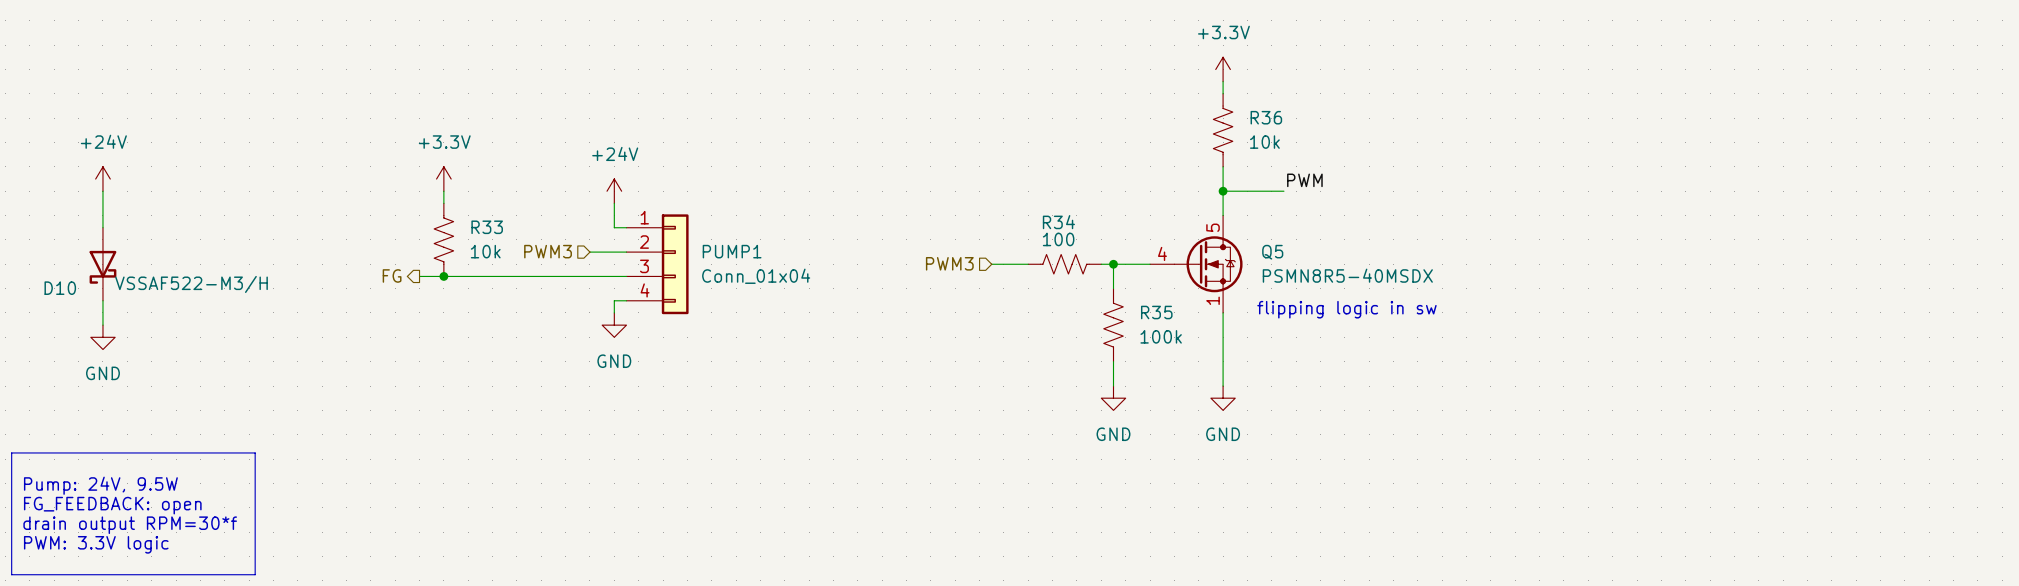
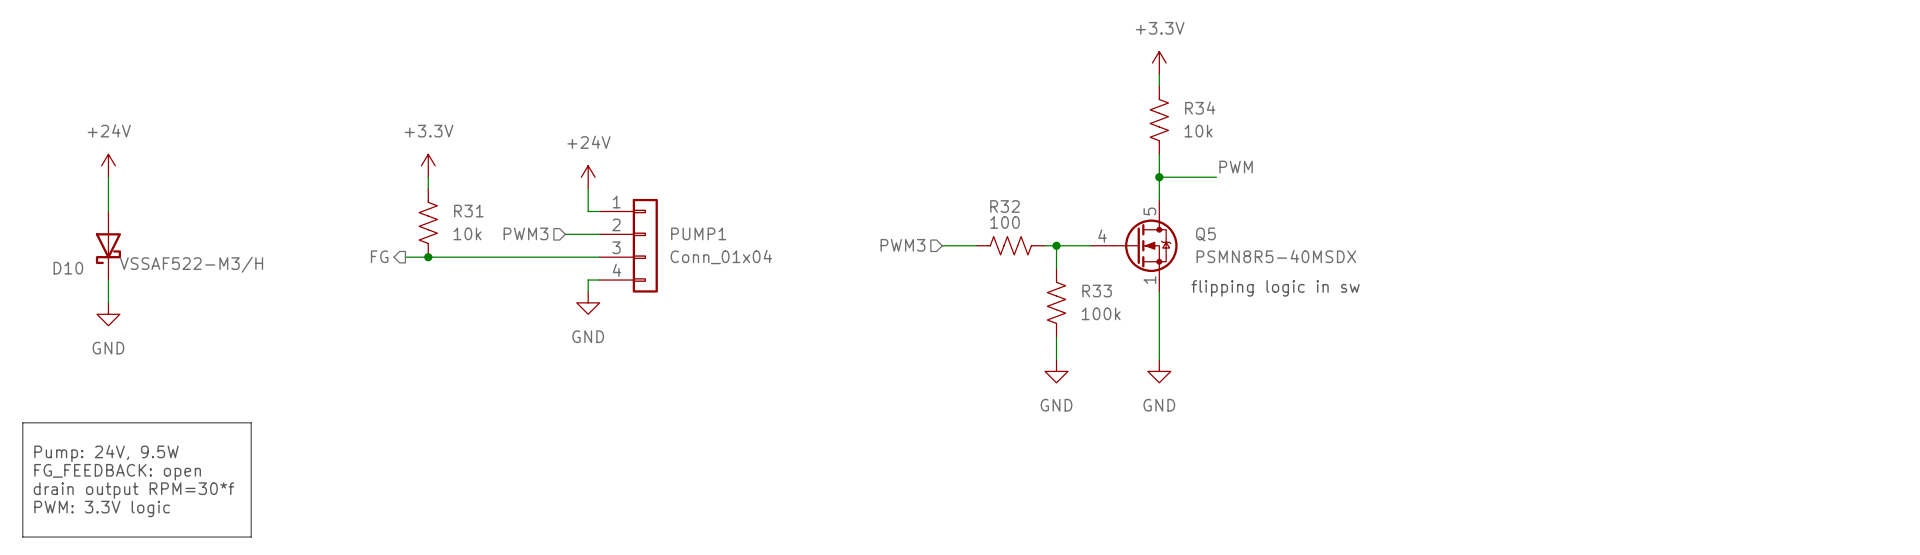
R36 name: R36 (1266, 117) -> R34 (1200, 107)
R34 name: R34 (1058, 222) -> R32 (1005, 206)
R33 name: R33 (487, 227) -> R31 (468, 211)
R35 name: R35 (1156, 312) -> R33 (1097, 291)

